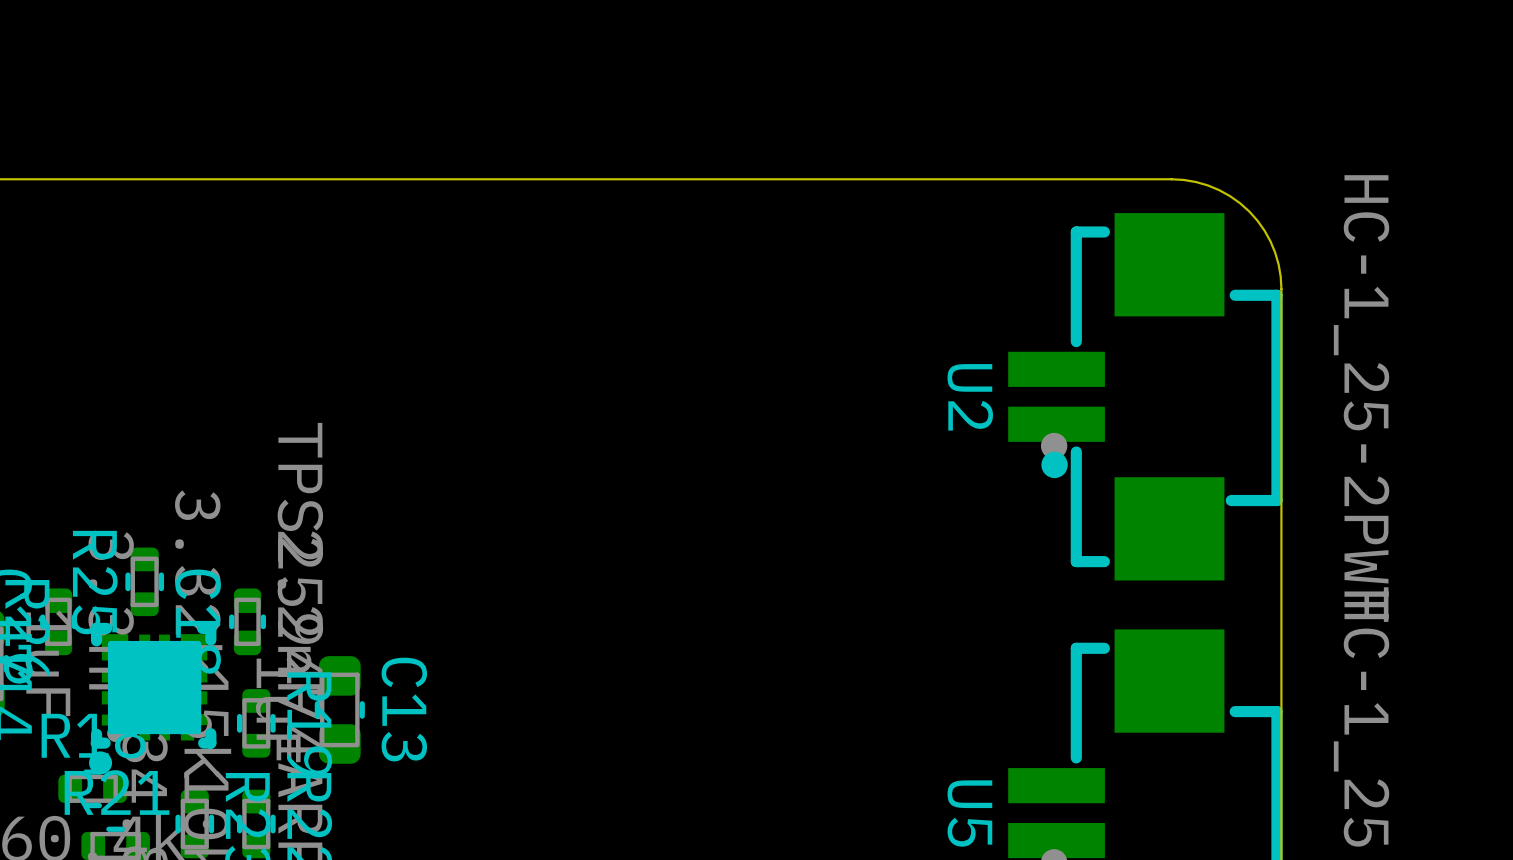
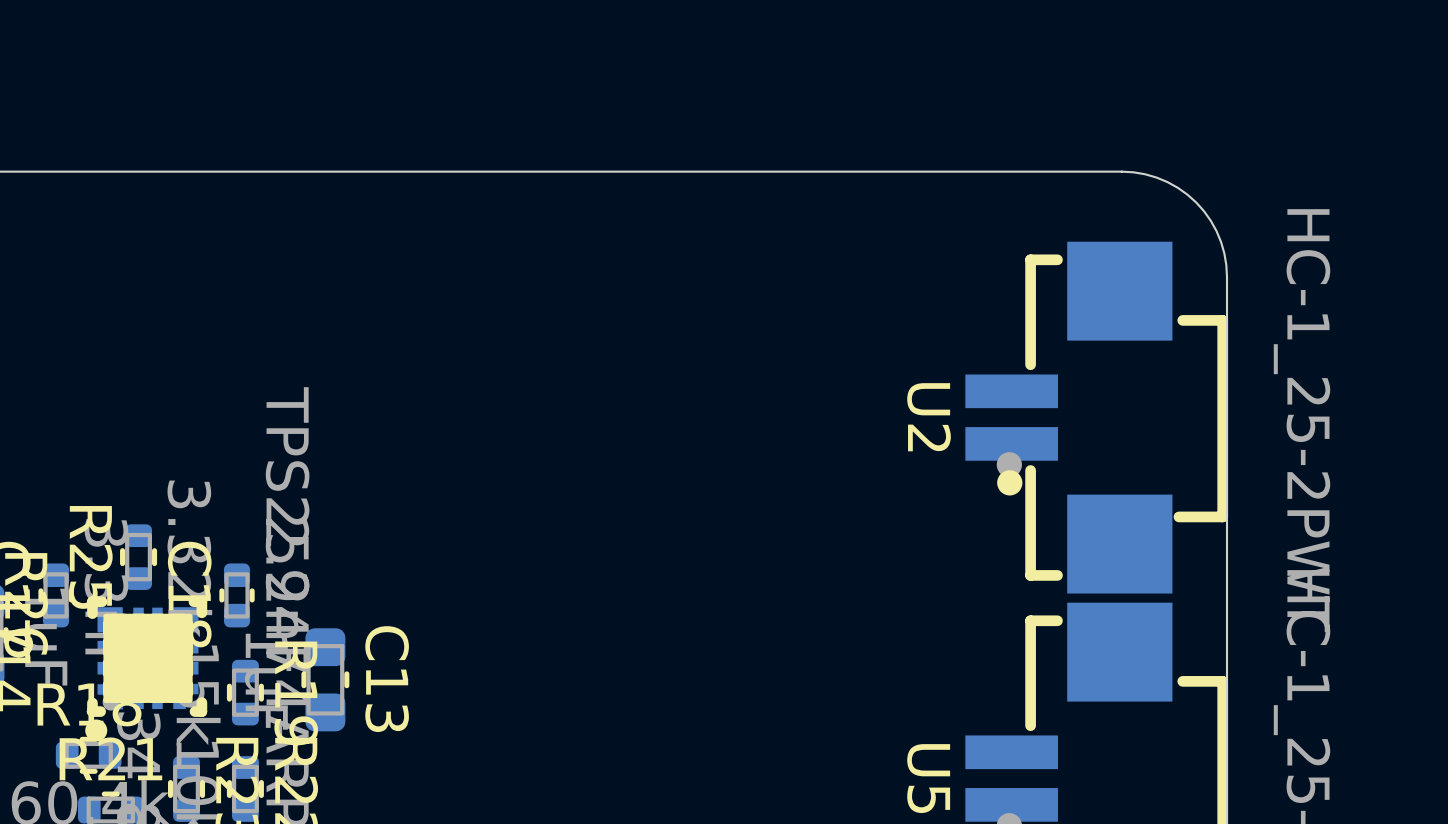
U2 position: (1145, 396) -> (1096, 417)

